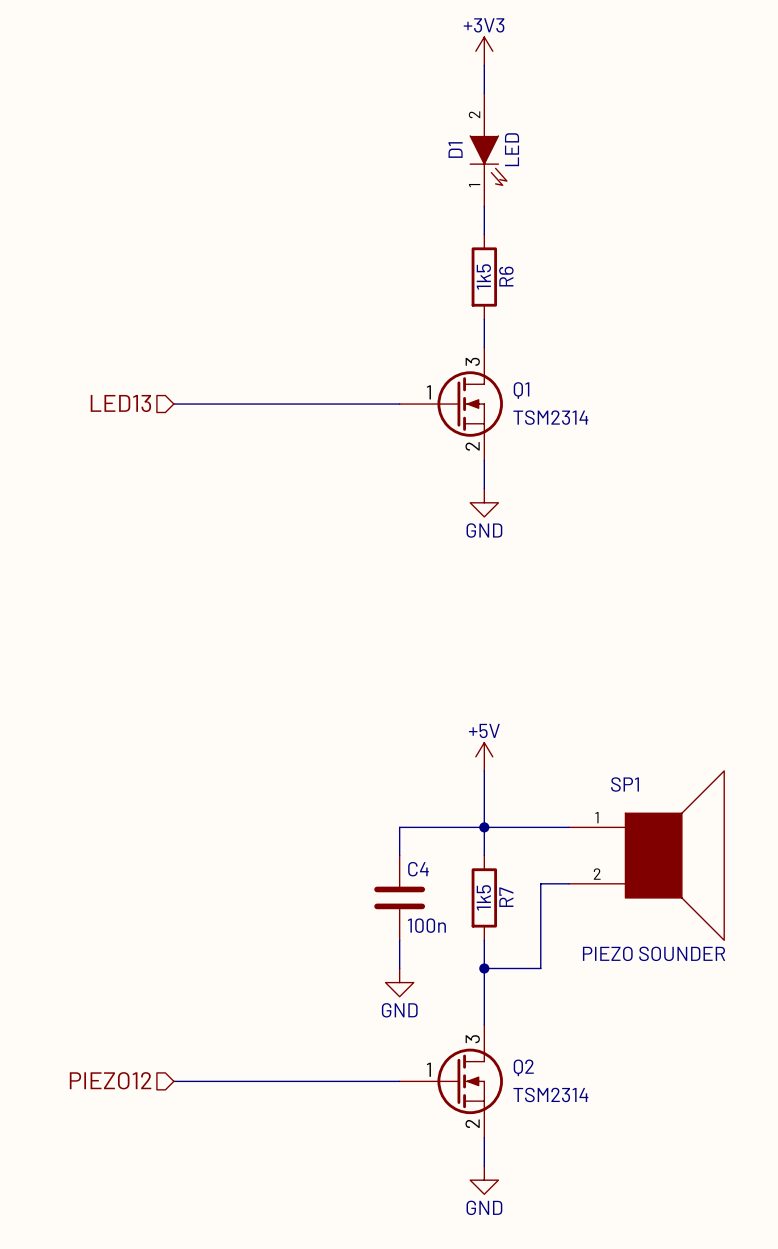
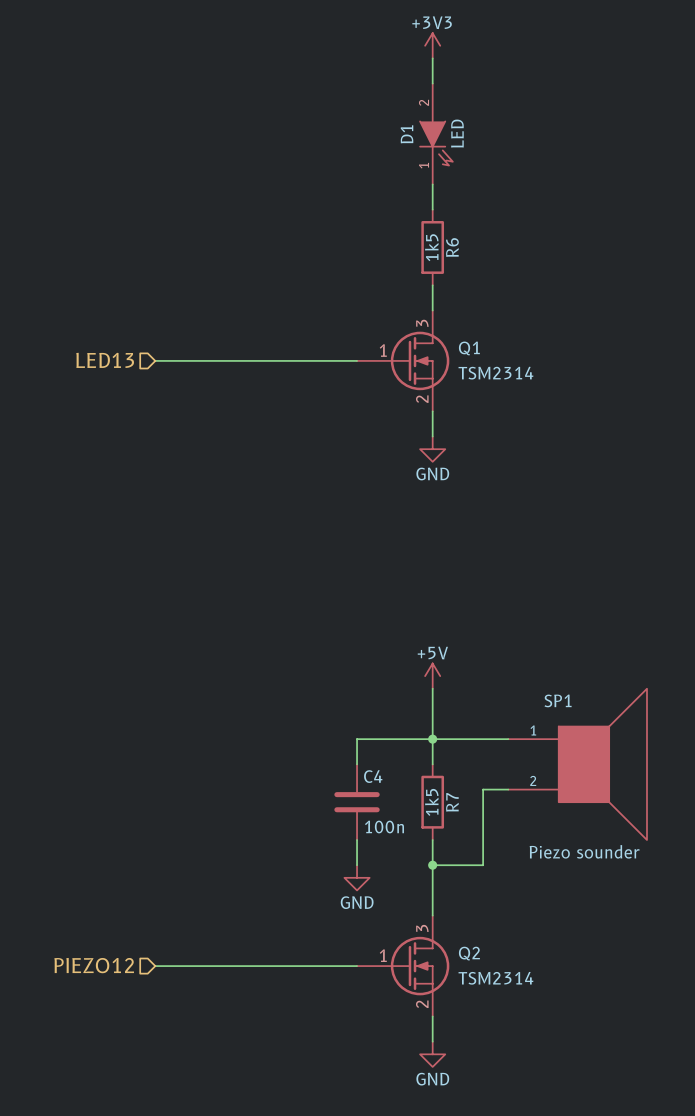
SP1 value: PIEZO SOUNDER (654, 953) -> Piezo sounder (584, 851)

